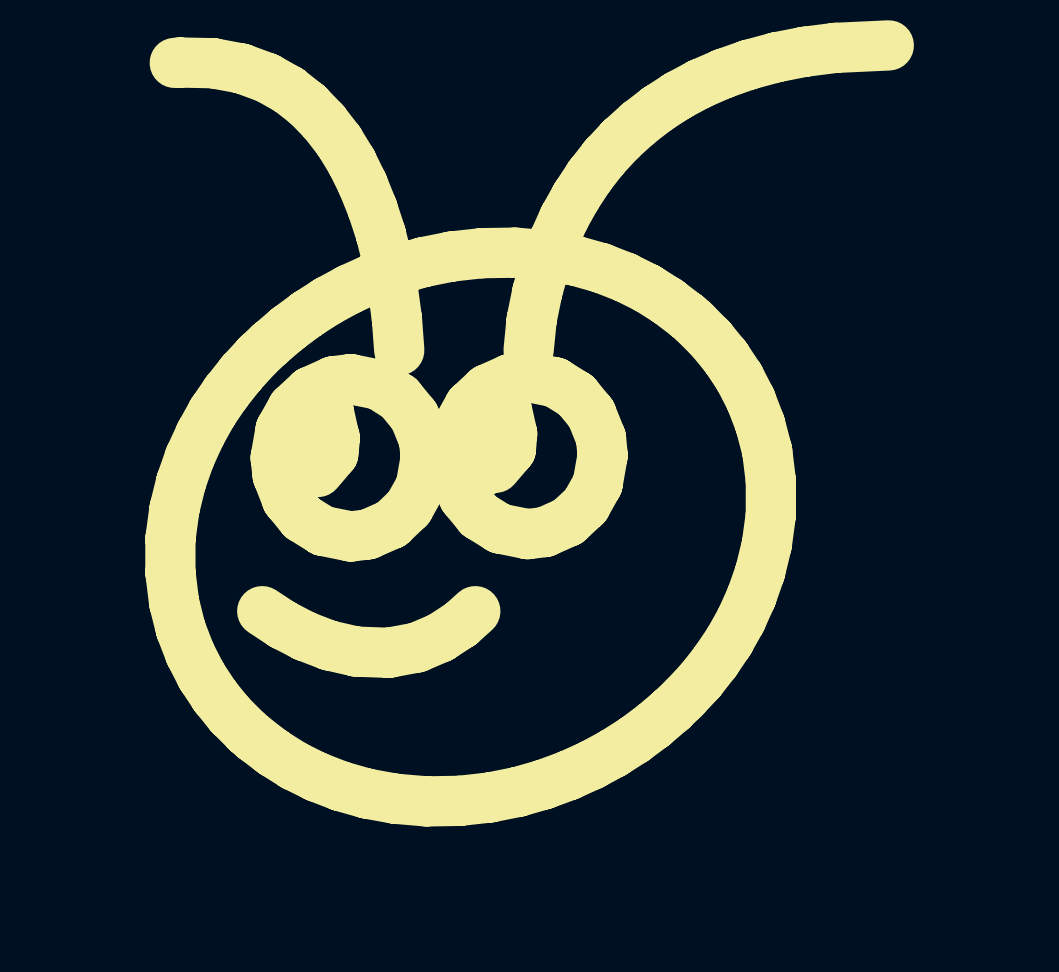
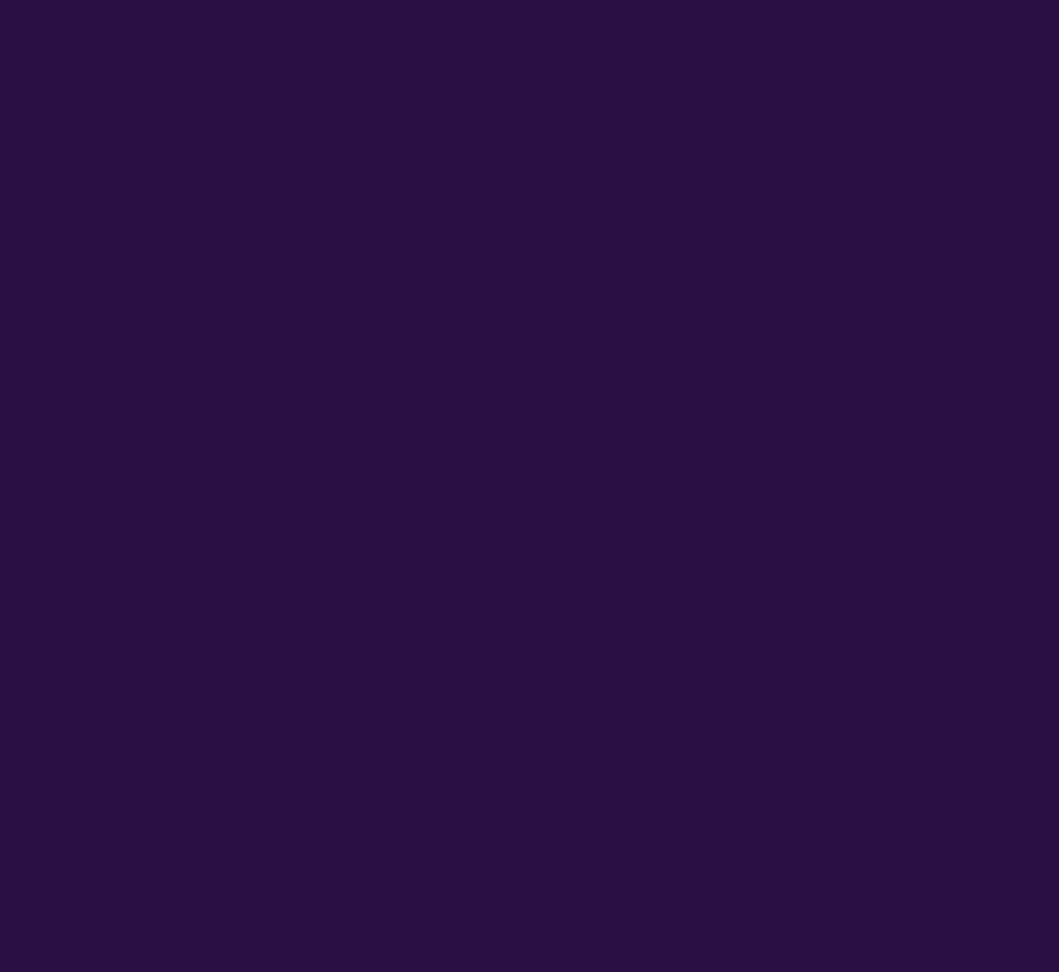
drawing: [145, 20, 914, 827] -> none

